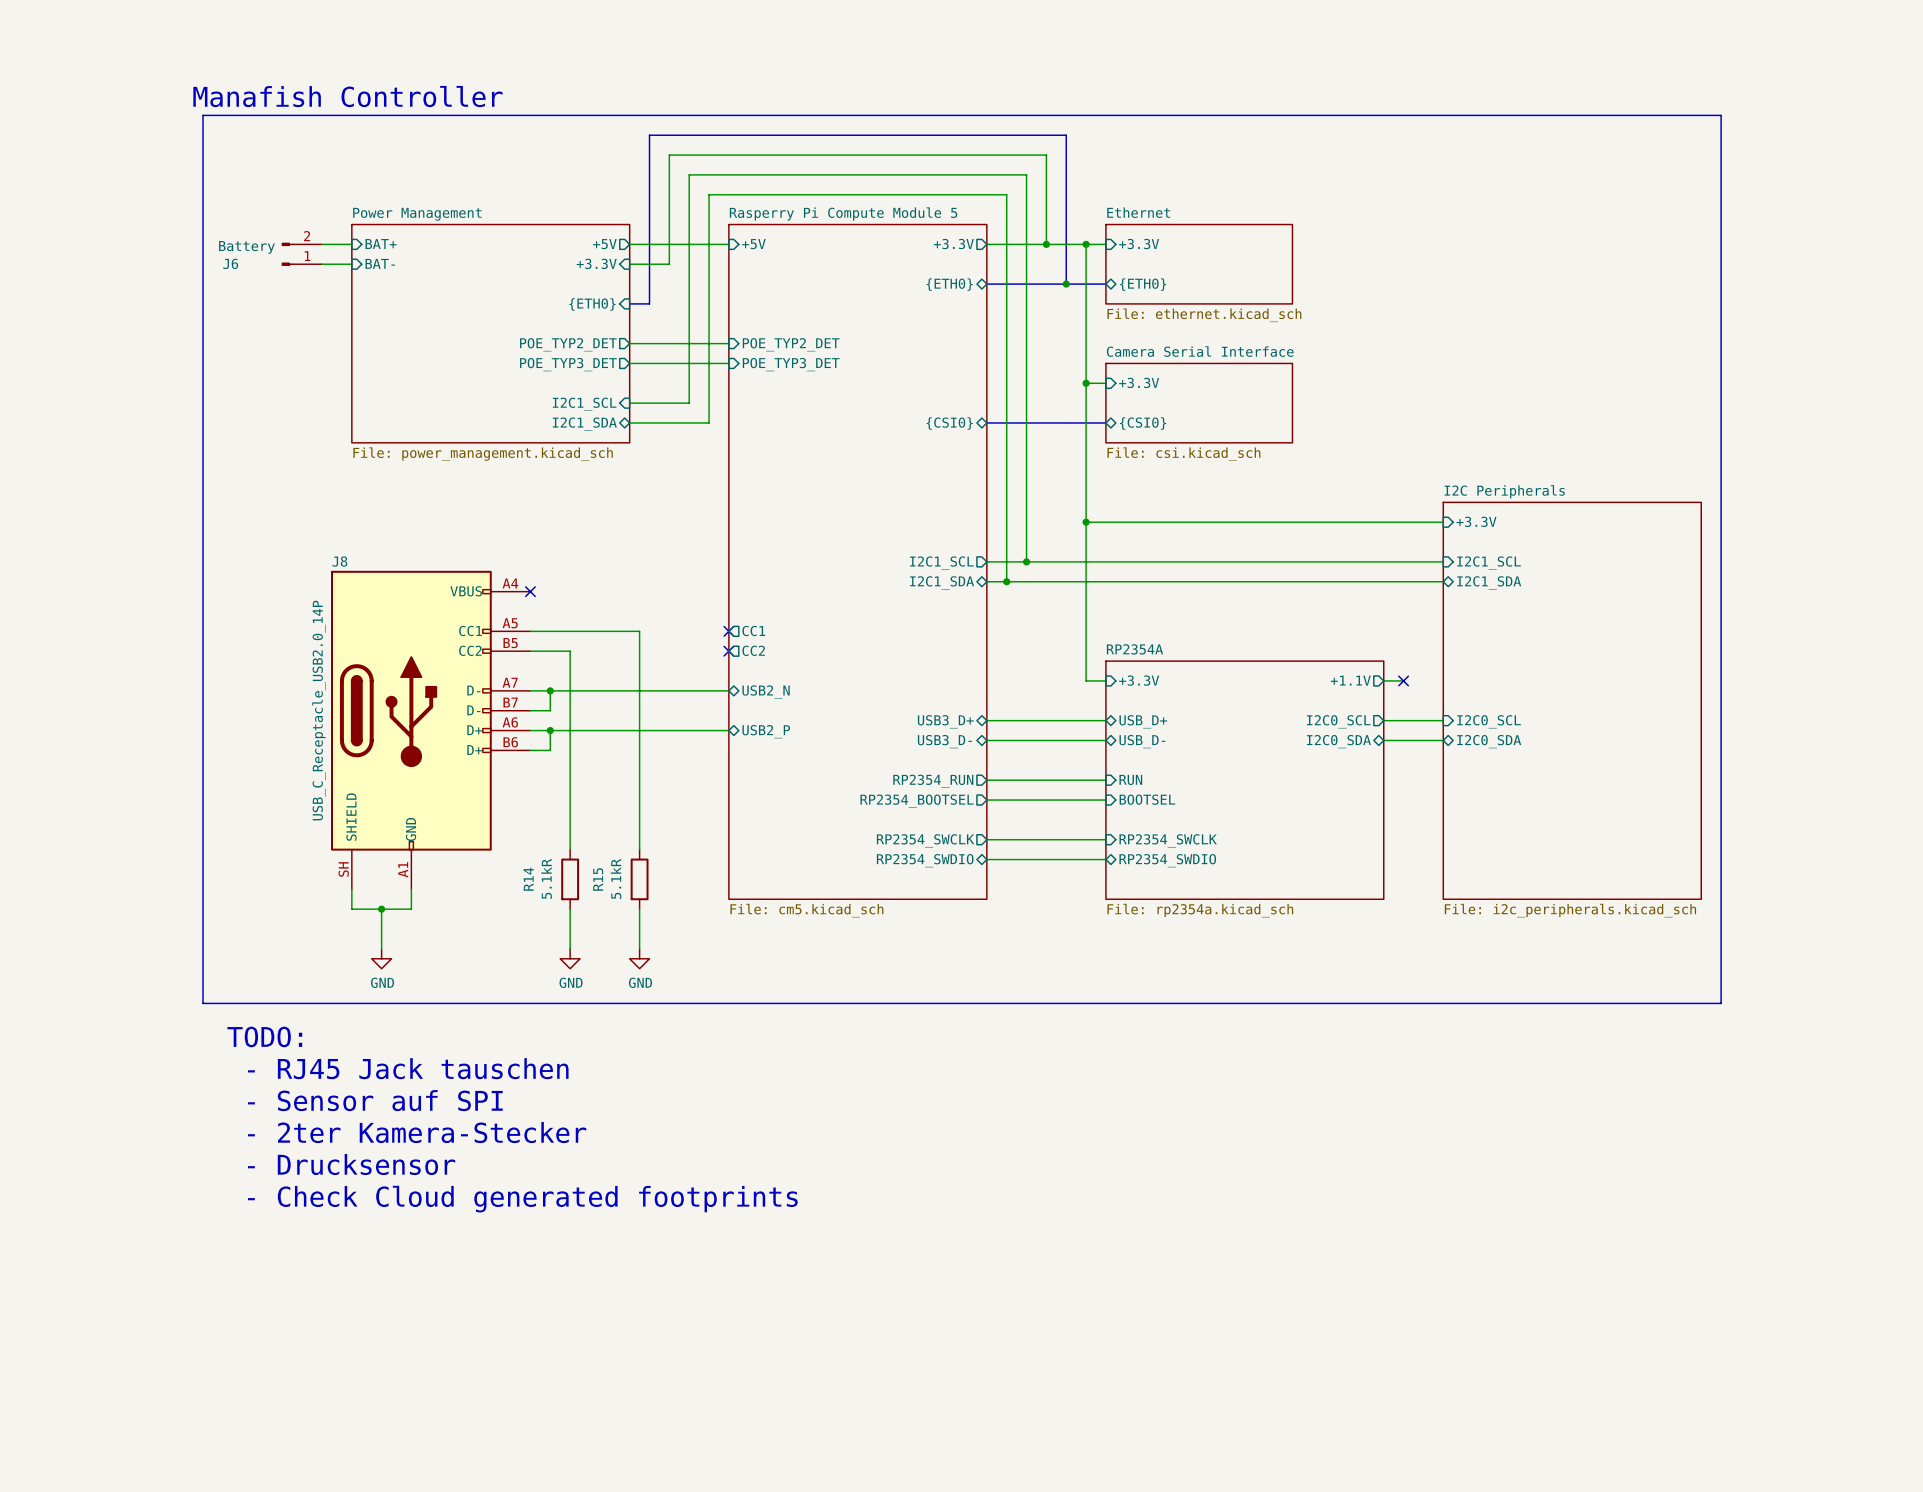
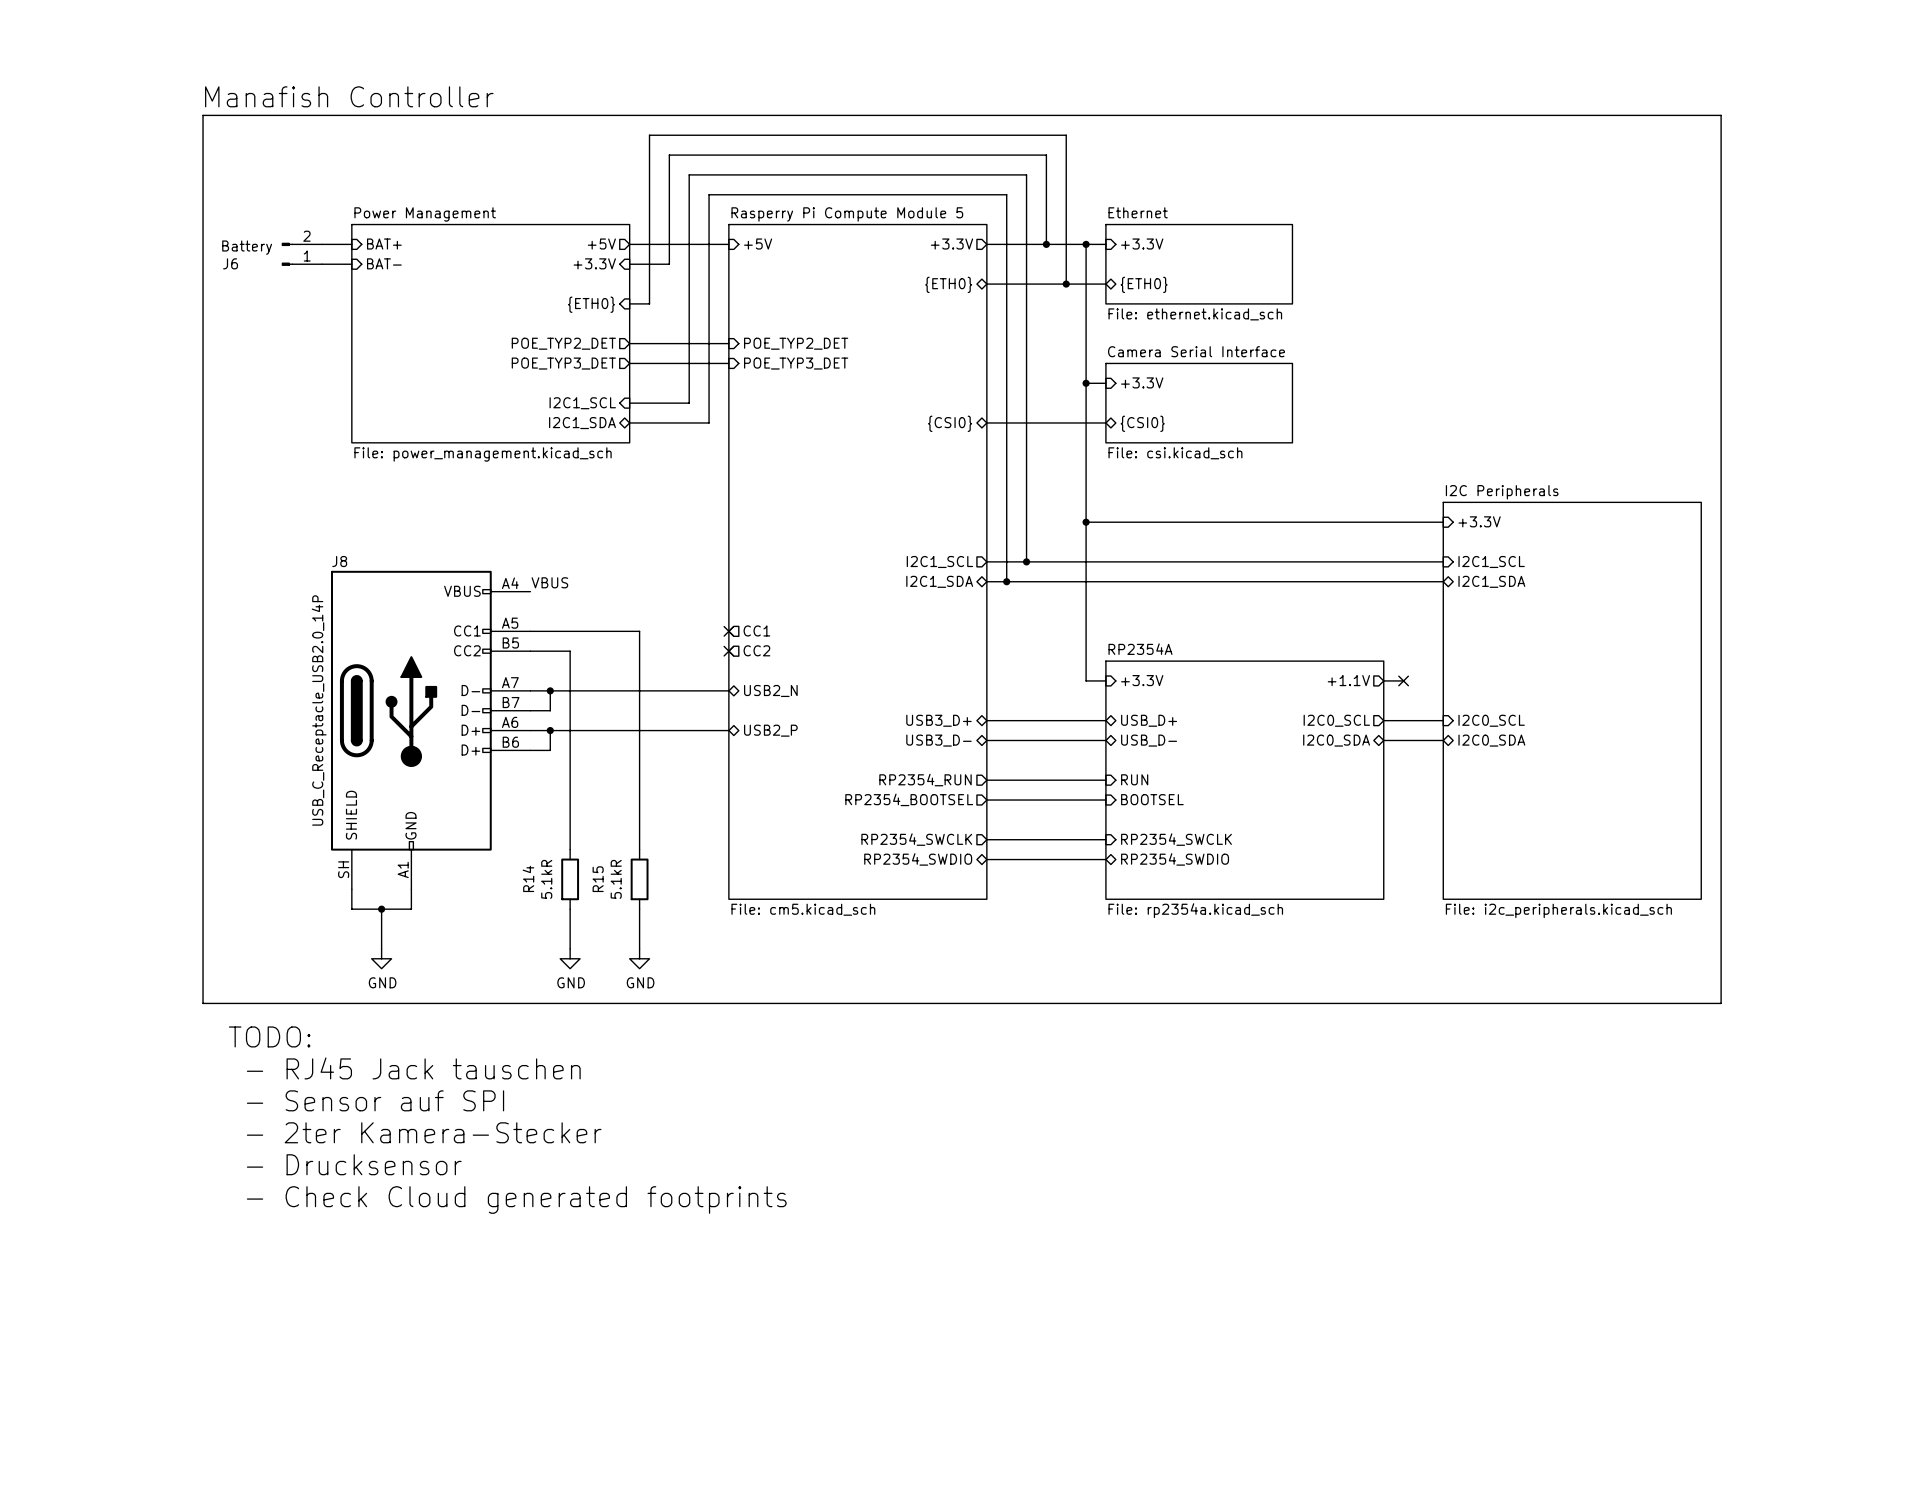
label: none -> VBUS (549, 582)
no-connect mark: (530, 591) -> none

